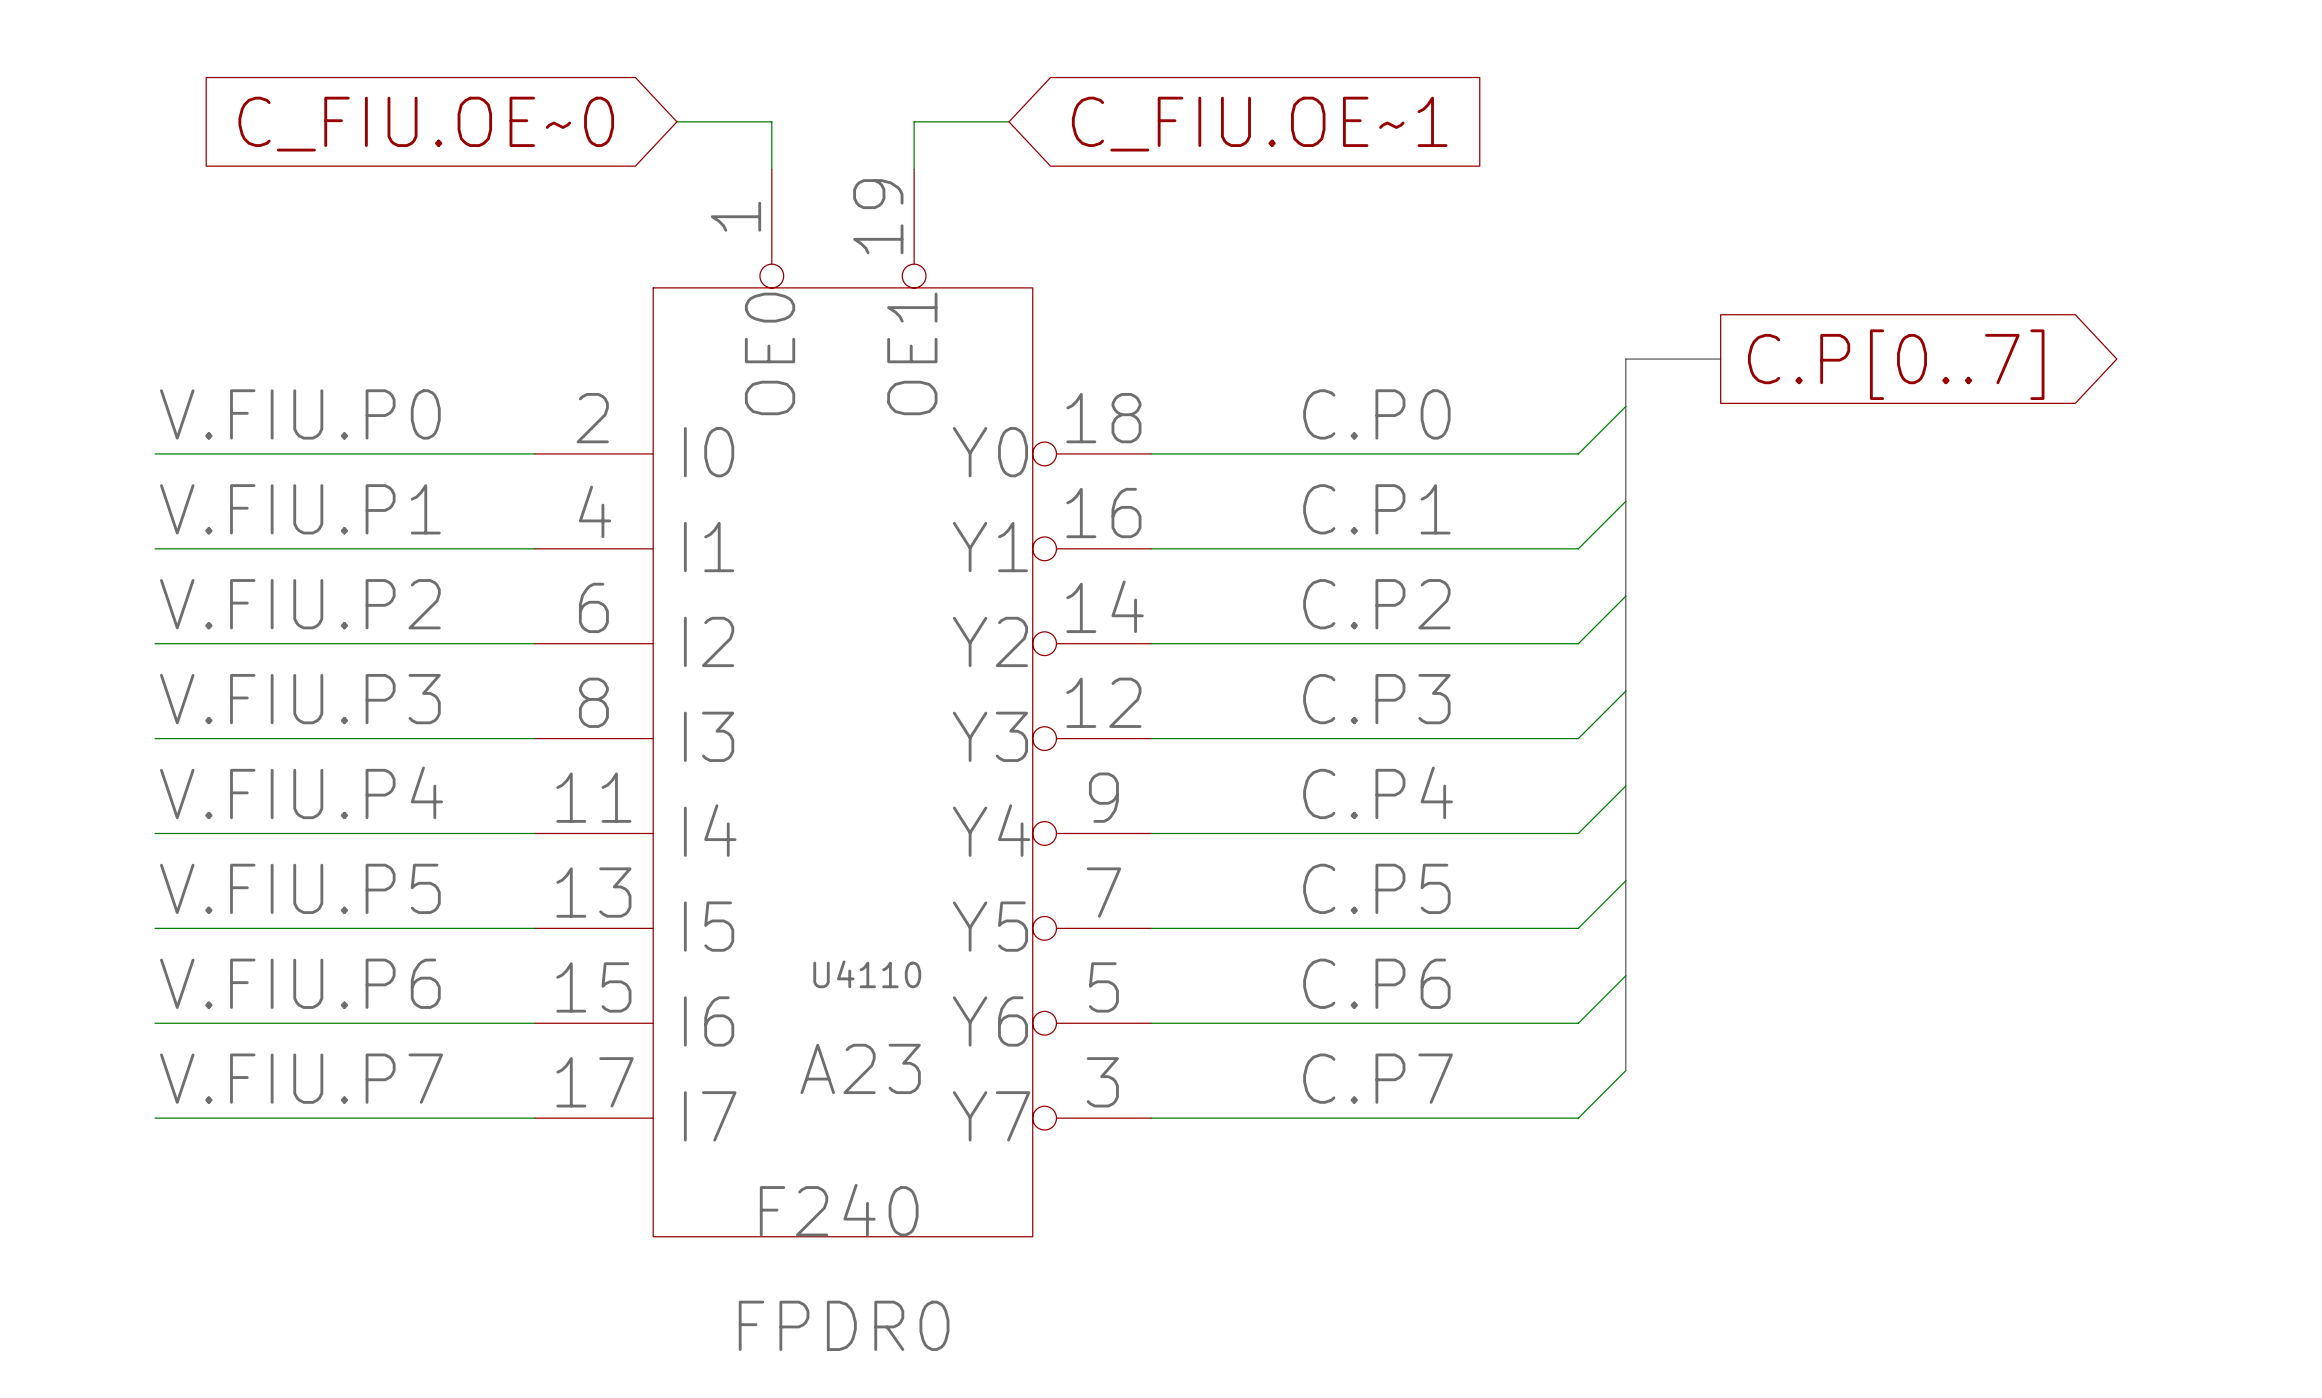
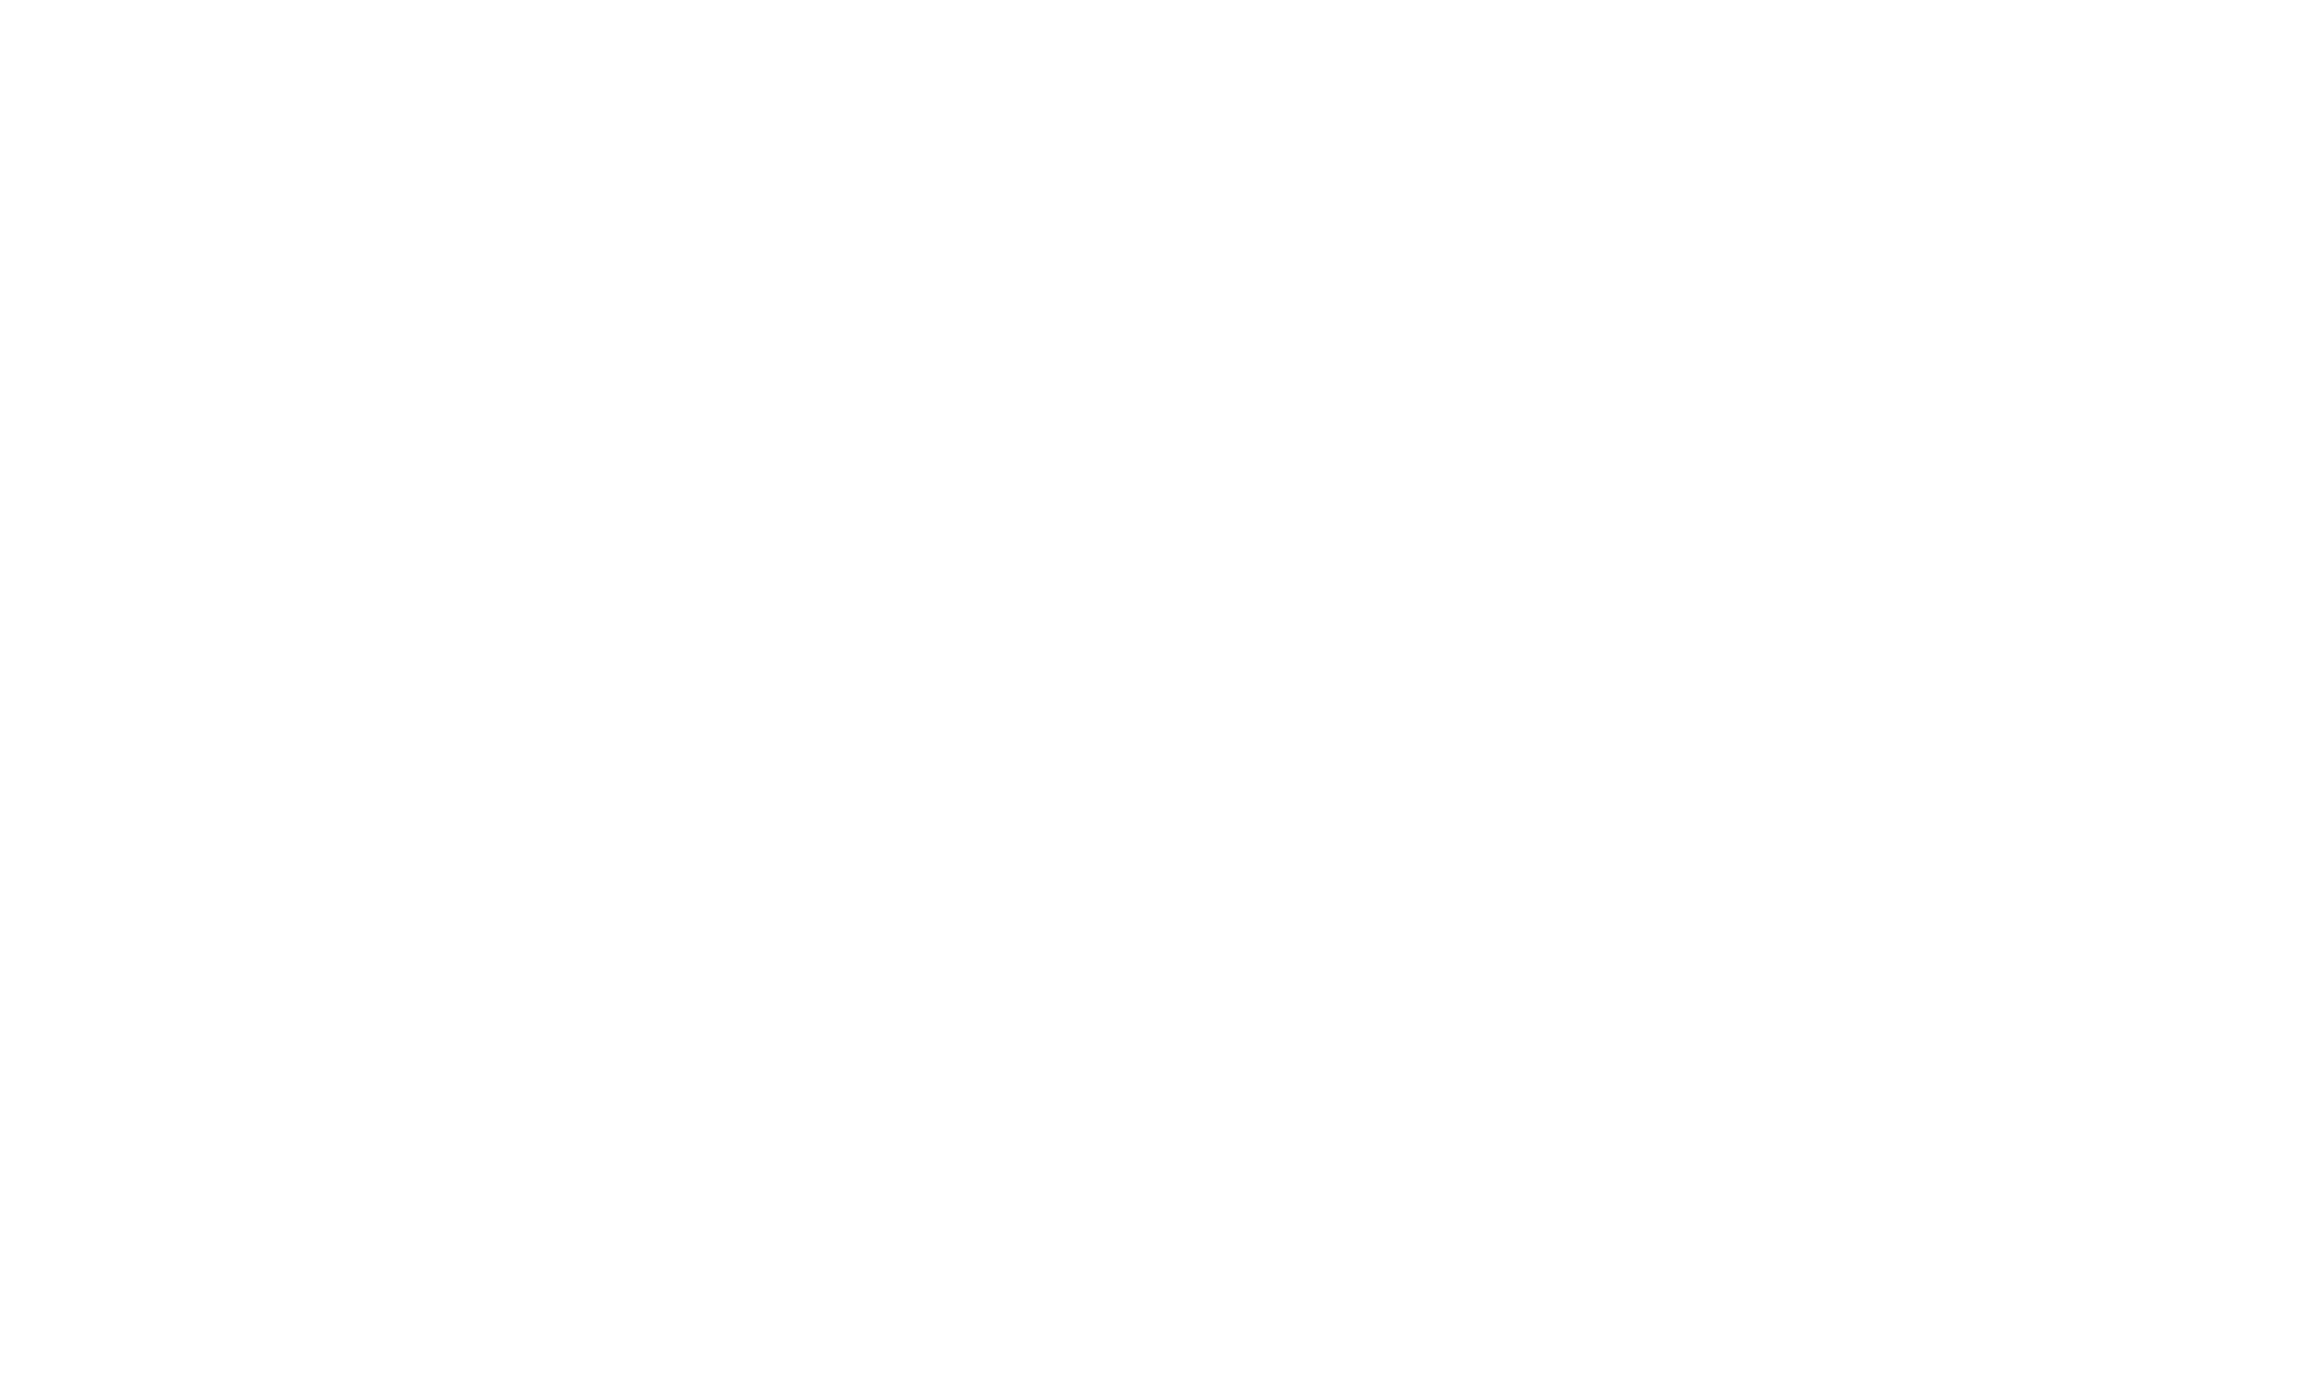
wire: (676, 121) (771, 121) (771, 169) -> none
wire: (1009, 121) (914, 121) (914, 169) -> none
global label: C_FIU.OE~0 (426, 124) -> none
global label: C_FIU.OE~1 (1259, 124) -> none
bus: (1720, 359) (1625, 359) (1625, 1070) -> none
global label: C.P[0..7] (1896, 364) -> none
wire: (1625, 406) (1578, 453) (1151, 453) -> none
label: V.FIU.P0 (300, 414) -> none
label: C.P0 (1376, 414) -> none
wire: (155, 453) (534, 453) -> none
wire: (1625, 501) (1578, 548) (1151, 548) -> none
label: V.FIU.P1 (300, 509) -> none
label: C.P1 (1376, 509) -> none
wire: (155, 548) (534, 548) -> none
wire: (1625, 596) (1578, 643) (1151, 643) -> none
label: V.FIU.P2 (300, 604) -> none
label: C.P2 (1376, 604) -> none
wire: (155, 643) (534, 643) -> none
wire: (1625, 691) (1578, 738) (1151, 738) -> none
label: V.FIU.P3 (300, 699) -> none
label: C.P3 (1376, 699) -> none
U4110: F240 (842, 703) -> none
wire: (155, 738) (534, 738) -> none
wire: (1625, 786) (1578, 833) (1151, 833) -> none
label: V.FIU.P4 (301, 792) -> none
label: C.P4 (1378, 792) -> none
wire: (155, 833) (534, 833) -> none
wire: (1625, 880) (1578, 928) (1151, 928) -> none
label: V.FIU.P5 (300, 888) -> none
label: C.P5 (1376, 888) -> none
wire: (155, 928) (534, 928) -> none
wire: (1625, 975) (1578, 1023) (1151, 1023) -> none
label: V.FIU.P6 (300, 983) -> none
label: C.P6 (1376, 983) -> none
wire: (155, 1023) (534, 1023) -> none
wire: (1625, 1070) (1578, 1118) (1151, 1118) -> none
label: V.FIU.P7 (301, 1078) -> none
label: C.P7 (1378, 1078) -> none
wire: (155, 1118) (534, 1118) -> none

